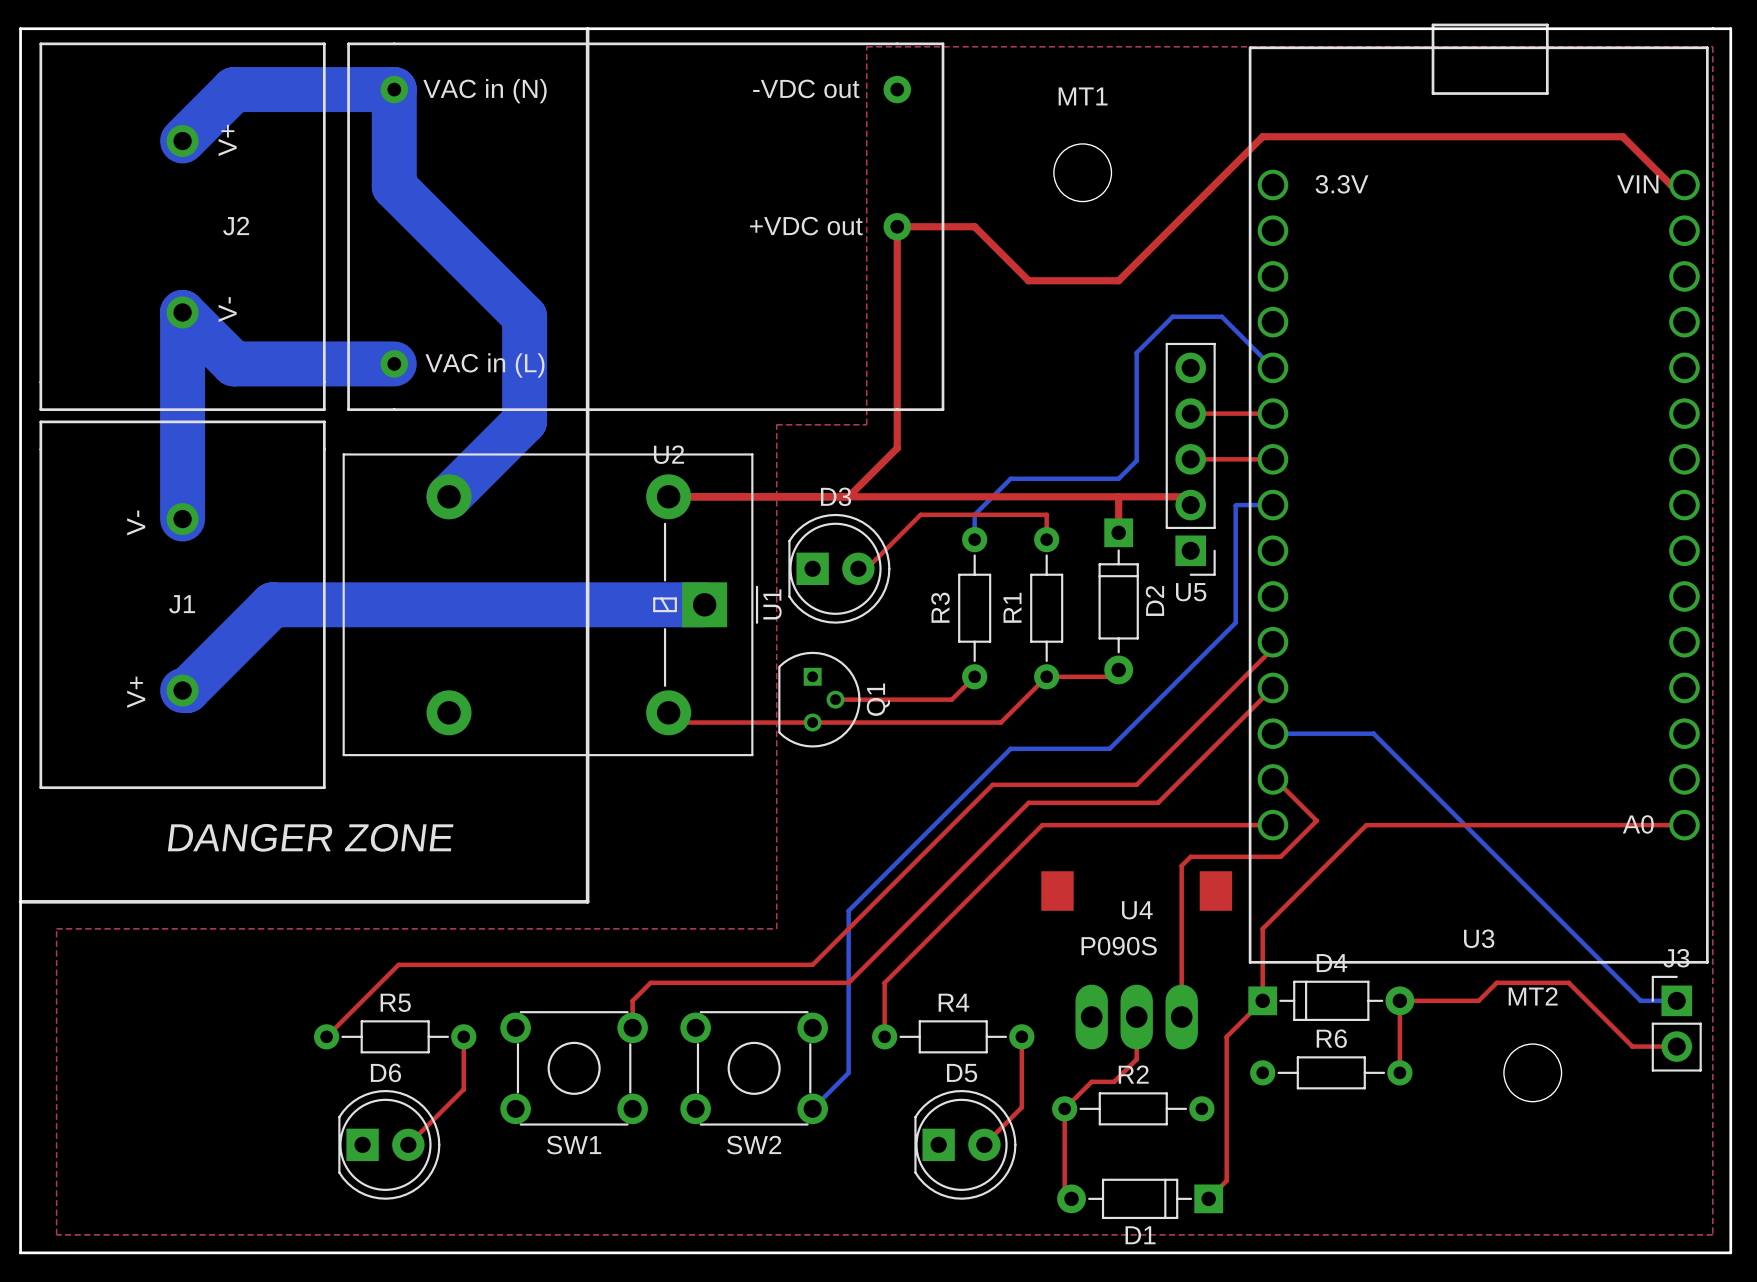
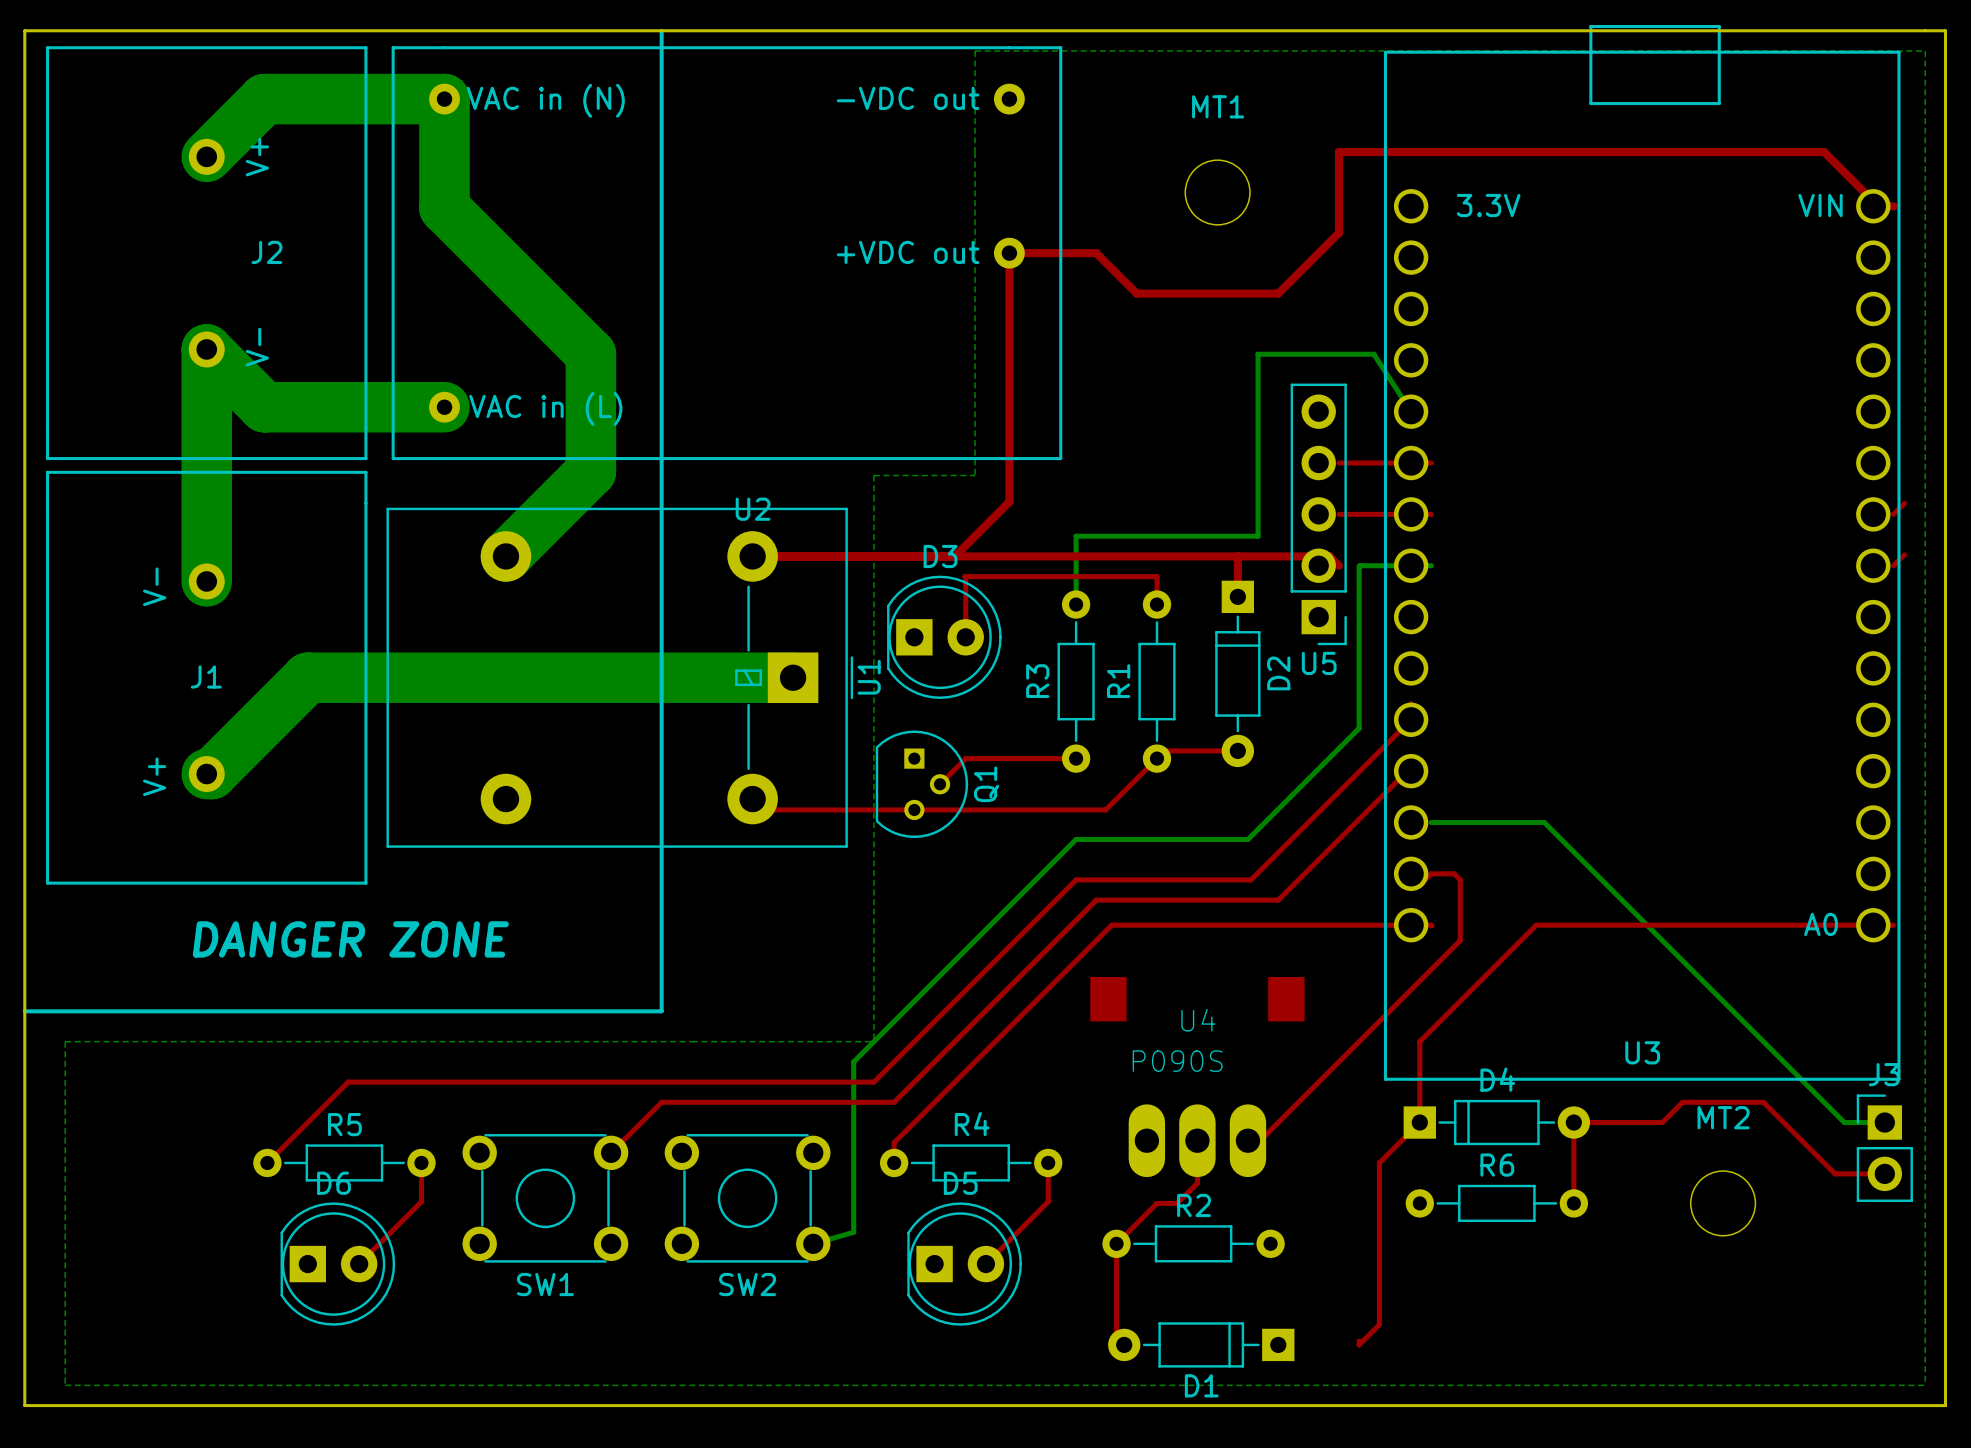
top zone outline: (866, 46) (866, 424) (776, 424) (776, 928) (56, 928) (56, 1234) (1712, 1234) (1712, 46) (866, 46) -> none
top track: (1262, 136) (1190, 208) -> (1419, 152) (1338, 152) (1338, 232)
top track: (1010, 262) (1028, 280) (1118, 280) (1136, 262) -> (1136, 293) (1278, 293)
bottom track: (1172, 316) (1136, 352) (1136, 460) (1118, 478) -> (1318, 354) (1258, 354) (1258, 536)
bottom track: (1221, 316) (1272, 367) -> (1373, 354) (1411, 411)
U5 position: (1190, 459) -> (1318, 514)
bottom track: (1010, 478) (974, 514) (974, 539) -> (1136, 536) (1076, 536) (1076, 604)
U3 position: (1478, 493) -> (1642, 552)
top track: (1118, 496) (1118, 532) -> (1237, 556) (1237, 596)
bottom track: (1236, 505) (1235, 622) (1208, 649) -> (1390, 565) (1359, 566) (1359, 728)
top track: (920, 514) (866, 568) -> (1035, 576) (964, 576) (965, 637)
top track: (1028, 514) (1046, 514) (1046, 539) -> (1156, 576) (1156, 604)
D2 position: (1118, 601) -> (1237, 673)
R3 position: (974, 608) -> (1076, 681)
R1 position: (1046, 608) -> (1156, 681)
top track: (1272, 642) (1272, 648) (1136, 784) (1112, 784) -> (1411, 703) (1411, 719) (1250, 879)
top track: none -> (1076, 758) (965, 758) (945, 778)
top track: (974, 676) (951, 699) (835, 699) -> none
top track: (1125, 676) (1118, 669) (1111, 676) (1046, 676) (1000, 722) (982, 722) -> (1237, 750) (1164, 750) (1105, 809)
top track: (1272, 687) (1158, 802) (1136, 802) -> (1411, 771) (1407, 771) (1278, 900)
bottom track: (1010, 748) (848, 910) (848, 1072) (812, 1108) -> (1136, 839) (1076, 839) (853, 1061) (853, 1232) (813, 1243)
top track: (1275, 779) (1316, 820) (1298, 838) -> (1433, 873) (1454, 873) (1460, 879) (1460, 940)
top track: (992, 784) (974, 802) -> (1156, 900) (1096, 900)
top track: none -> (1116, 879) (1076, 879) (873, 1082)
top track: (1028, 802) (848, 982) (794, 982) -> none
top track: (1042, 825) (884, 982) (884, 1036) -> (1172, 925) (1111, 925) (894, 1142) (894, 1162)
top track: (1280, 856) (1190, 856) (1181, 865) (1181, 1035) -> (1440, 960) (1260, 1140) (1247, 1140)
U4 position: (1136, 960) -> (1197, 1077)
top track: (398, 964) (326, 1036) -> (449, 1082) (348, 1082) (267, 1162)
top track: (776, 964) (812, 964) -> (894, 1102) (914, 1082)
top track: (650, 982) (632, 1000) (632, 1027) -> (732, 1102) (661, 1102) (611, 1152)
top track: none -> (1197, 1140) (1197, 1183) (1177, 1203) (1156, 1203) (1116, 1243)
top track: (1136, 1035) (1136, 1059) (1114, 1081) (1091, 1081) (1064, 1108) -> none
top track: none -> (421, 1162) (421, 1201) (359, 1264)
R5 position: (395, 1036) -> (344, 1162)
top track: (463, 1036) (463, 1089) (408, 1144) -> none
top track: none -> (1048, 1162) (1048, 1201) (985, 1264)
R4 position: (953, 1036) -> (971, 1162)
top track: (1021, 1036) (1021, 1107) (984, 1144) -> none
SW1 position: (574, 1068) -> (545, 1198)
SW2 position: (754, 1068) -> (747, 1198)
top track: (1064, 1108) (1064, 1192) (1071, 1198) -> (1116, 1243) (1116, 1337) (1124, 1344)
R2 position: (1133, 1108) -> (1193, 1243)
D6 position: (389, 1144) -> (337, 1264)
D5 position: (965, 1144) -> (964, 1264)
D1 position: (1140, 1198) -> (1201, 1344)

